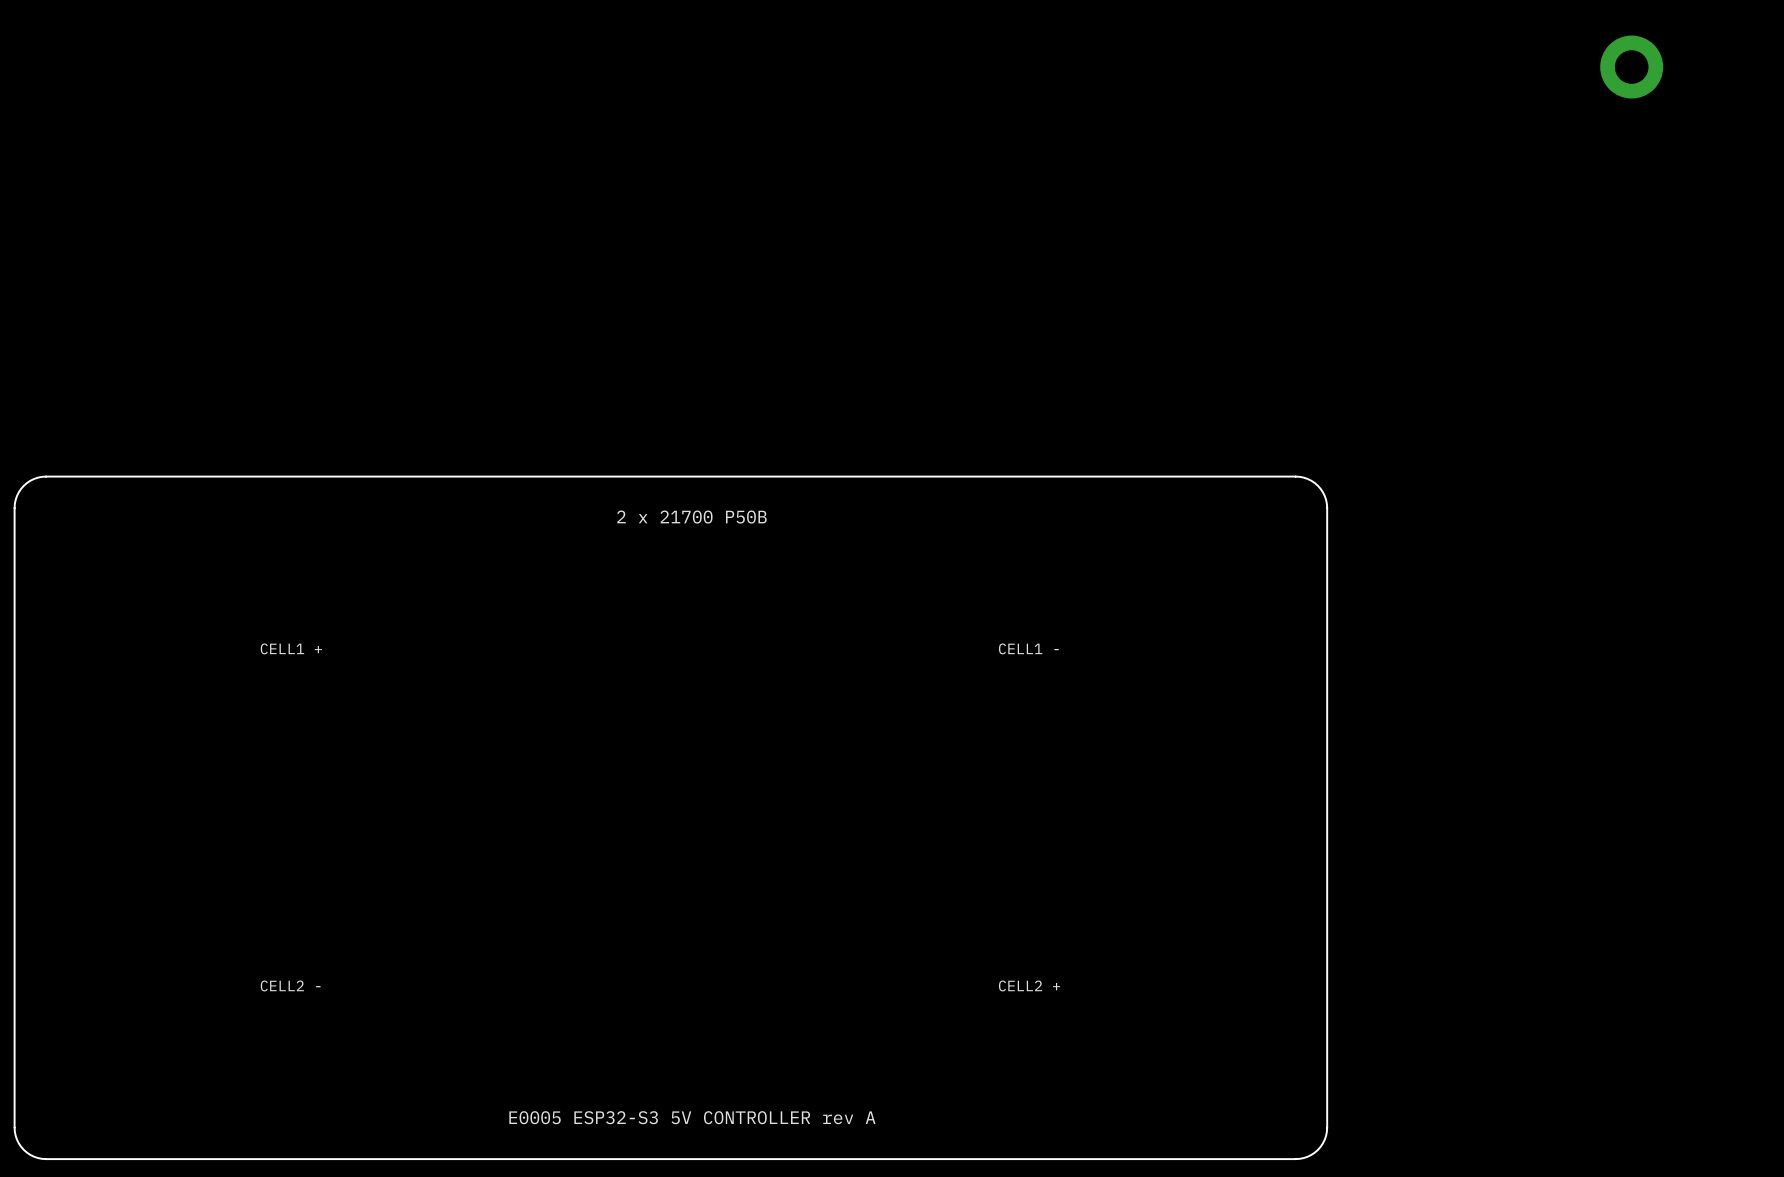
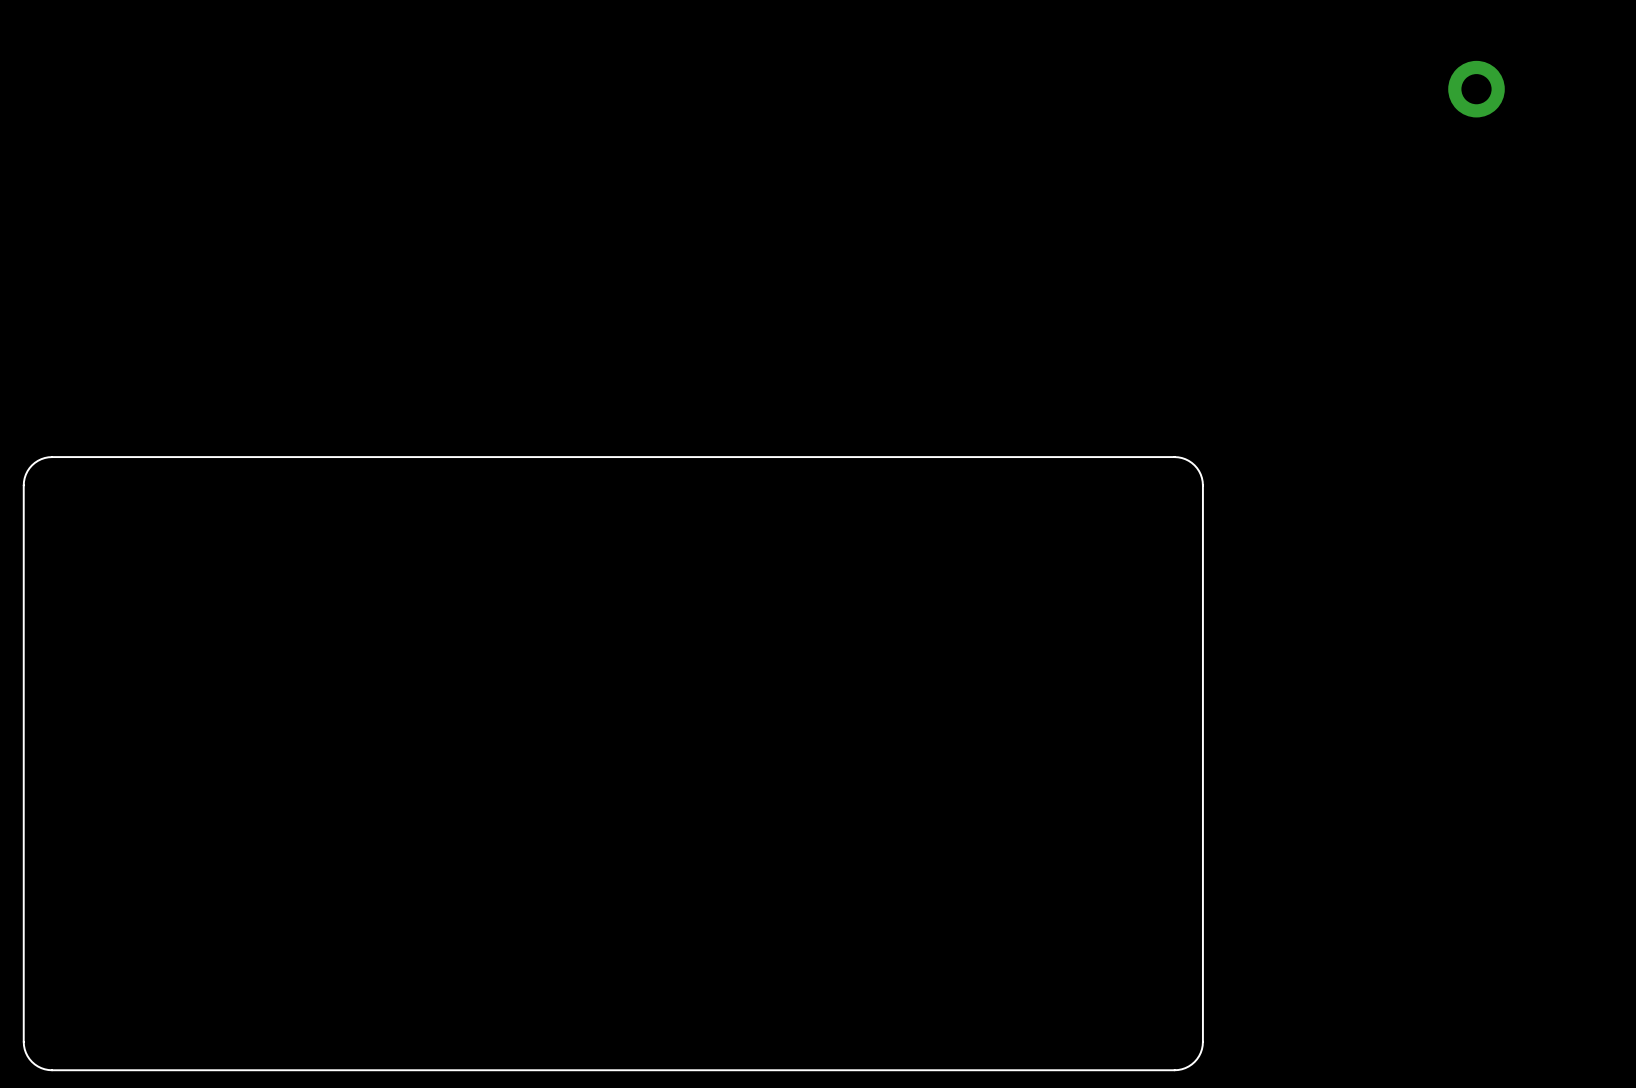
text: 2 x 21700 P50B (691, 517) -> none
text: CELL1 + (291, 648) -> none
text: CELL1 - (1028, 648) -> none
text: CELL2 - (290, 985) -> none
text: CELL2 + (1029, 985) -> none
text: E0005 ESP32-S3 5V CONTROLLER rev A (692, 1117) -> none

